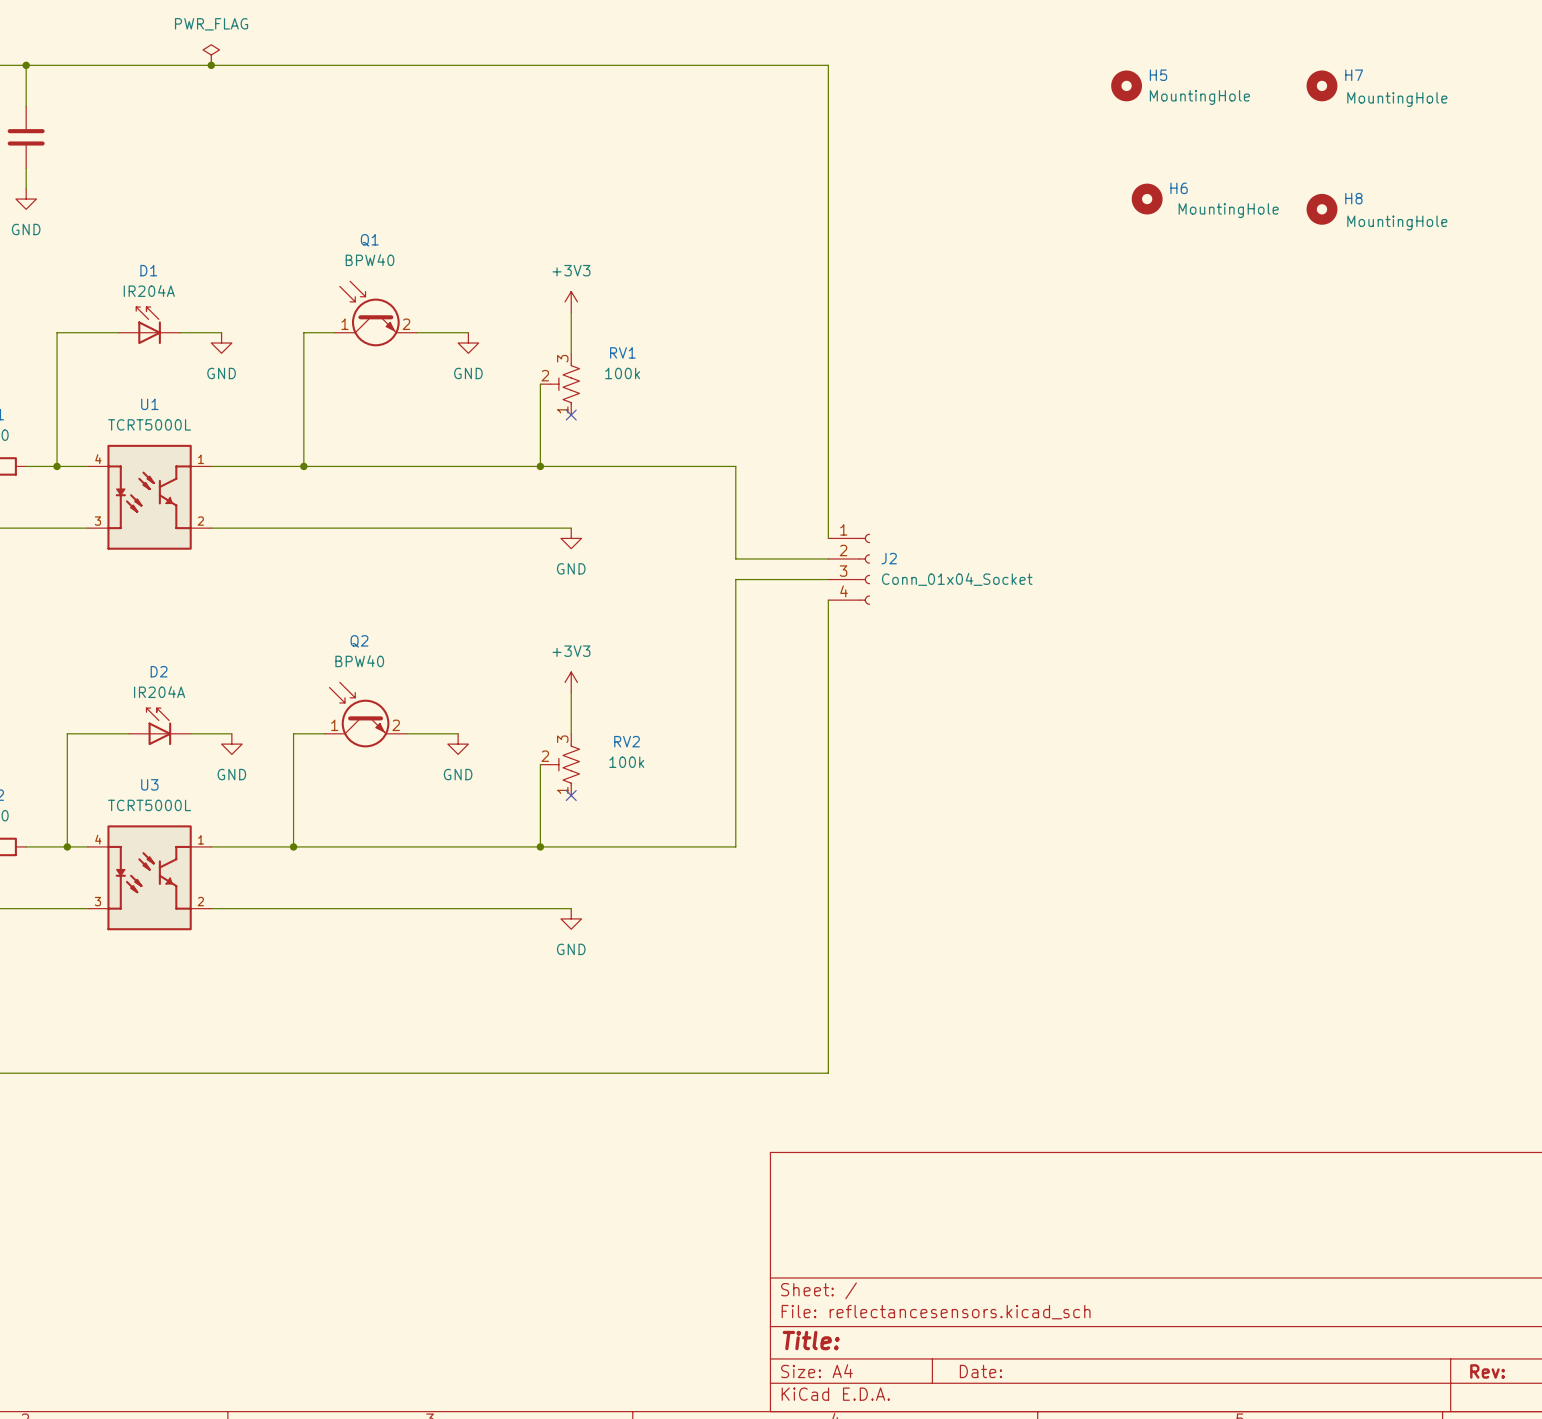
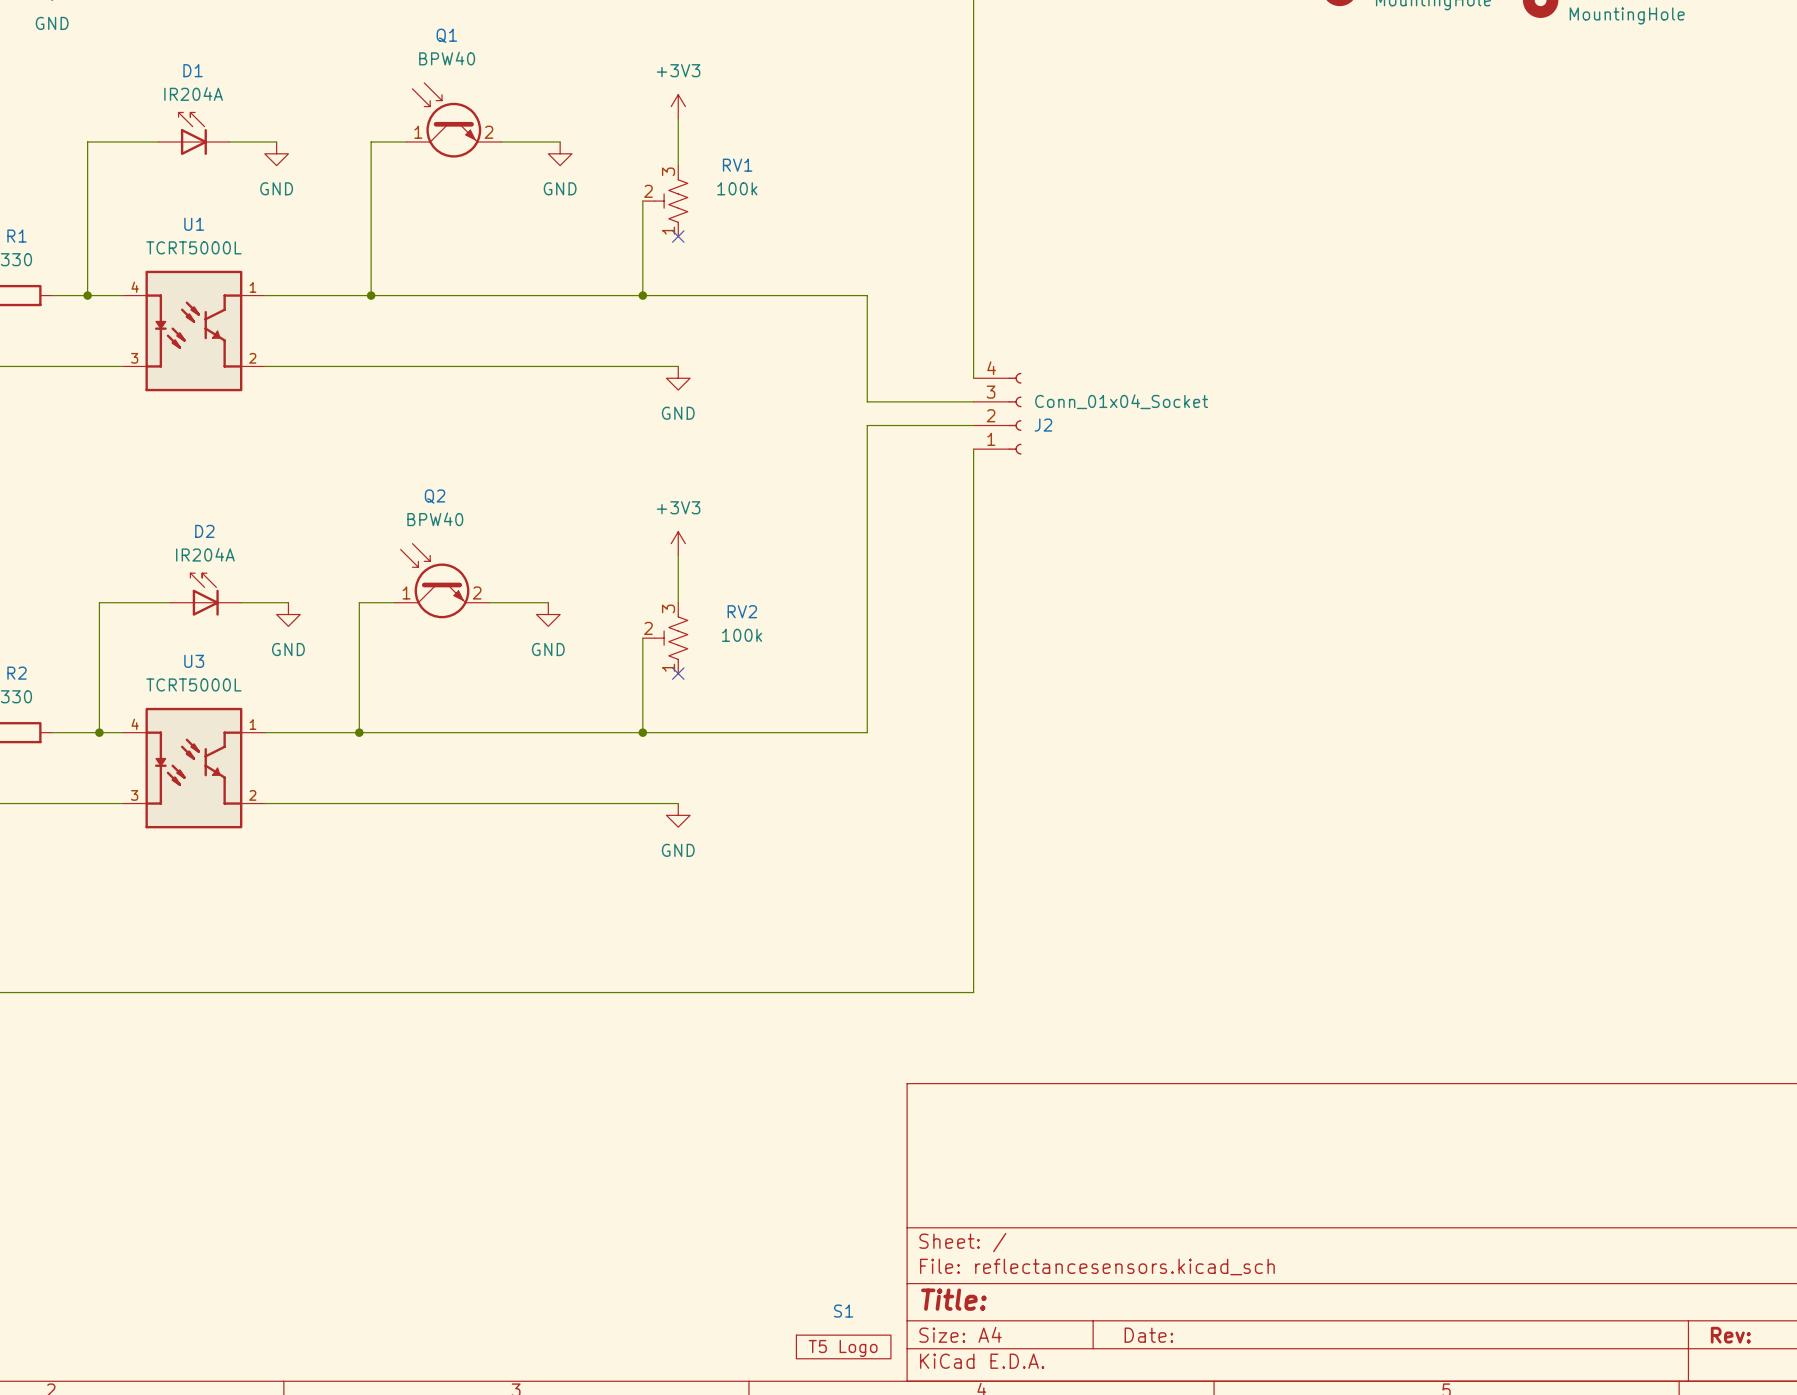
J2 flip: as is (864, 569) -> up-down (1014, 413)
S1: none -> (843, 1346)

